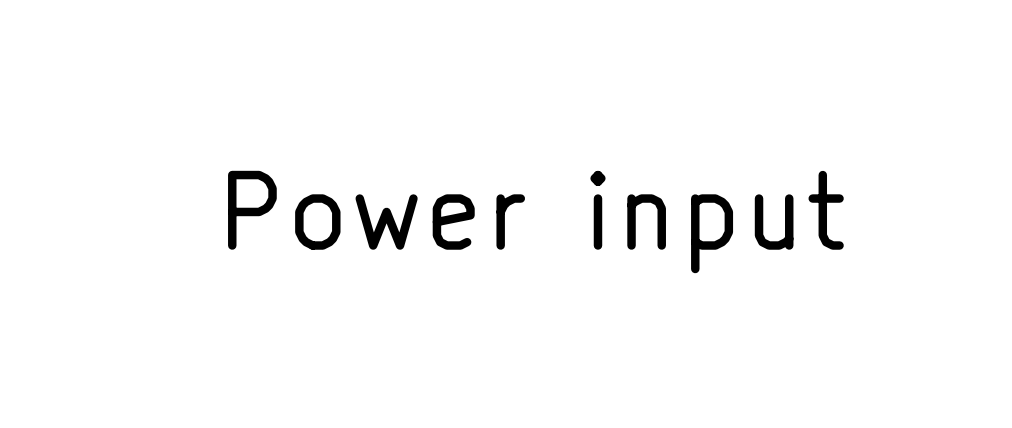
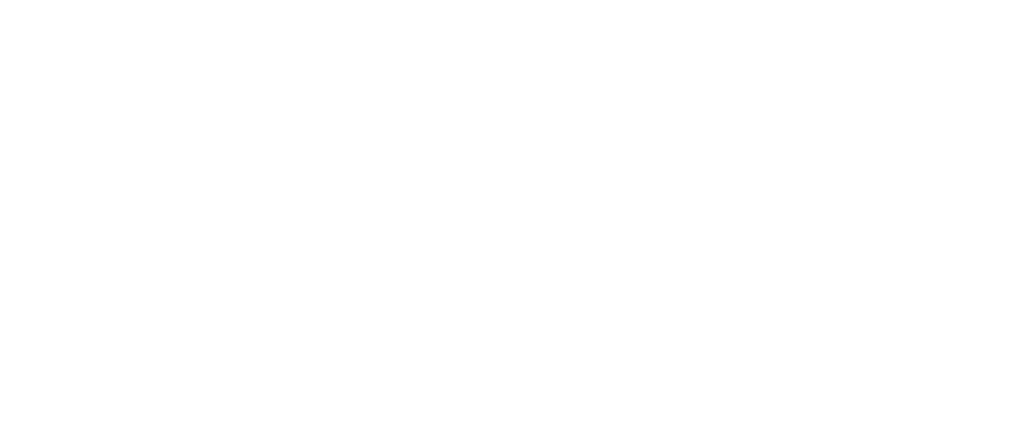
text: Power input (535, 222) -> none

